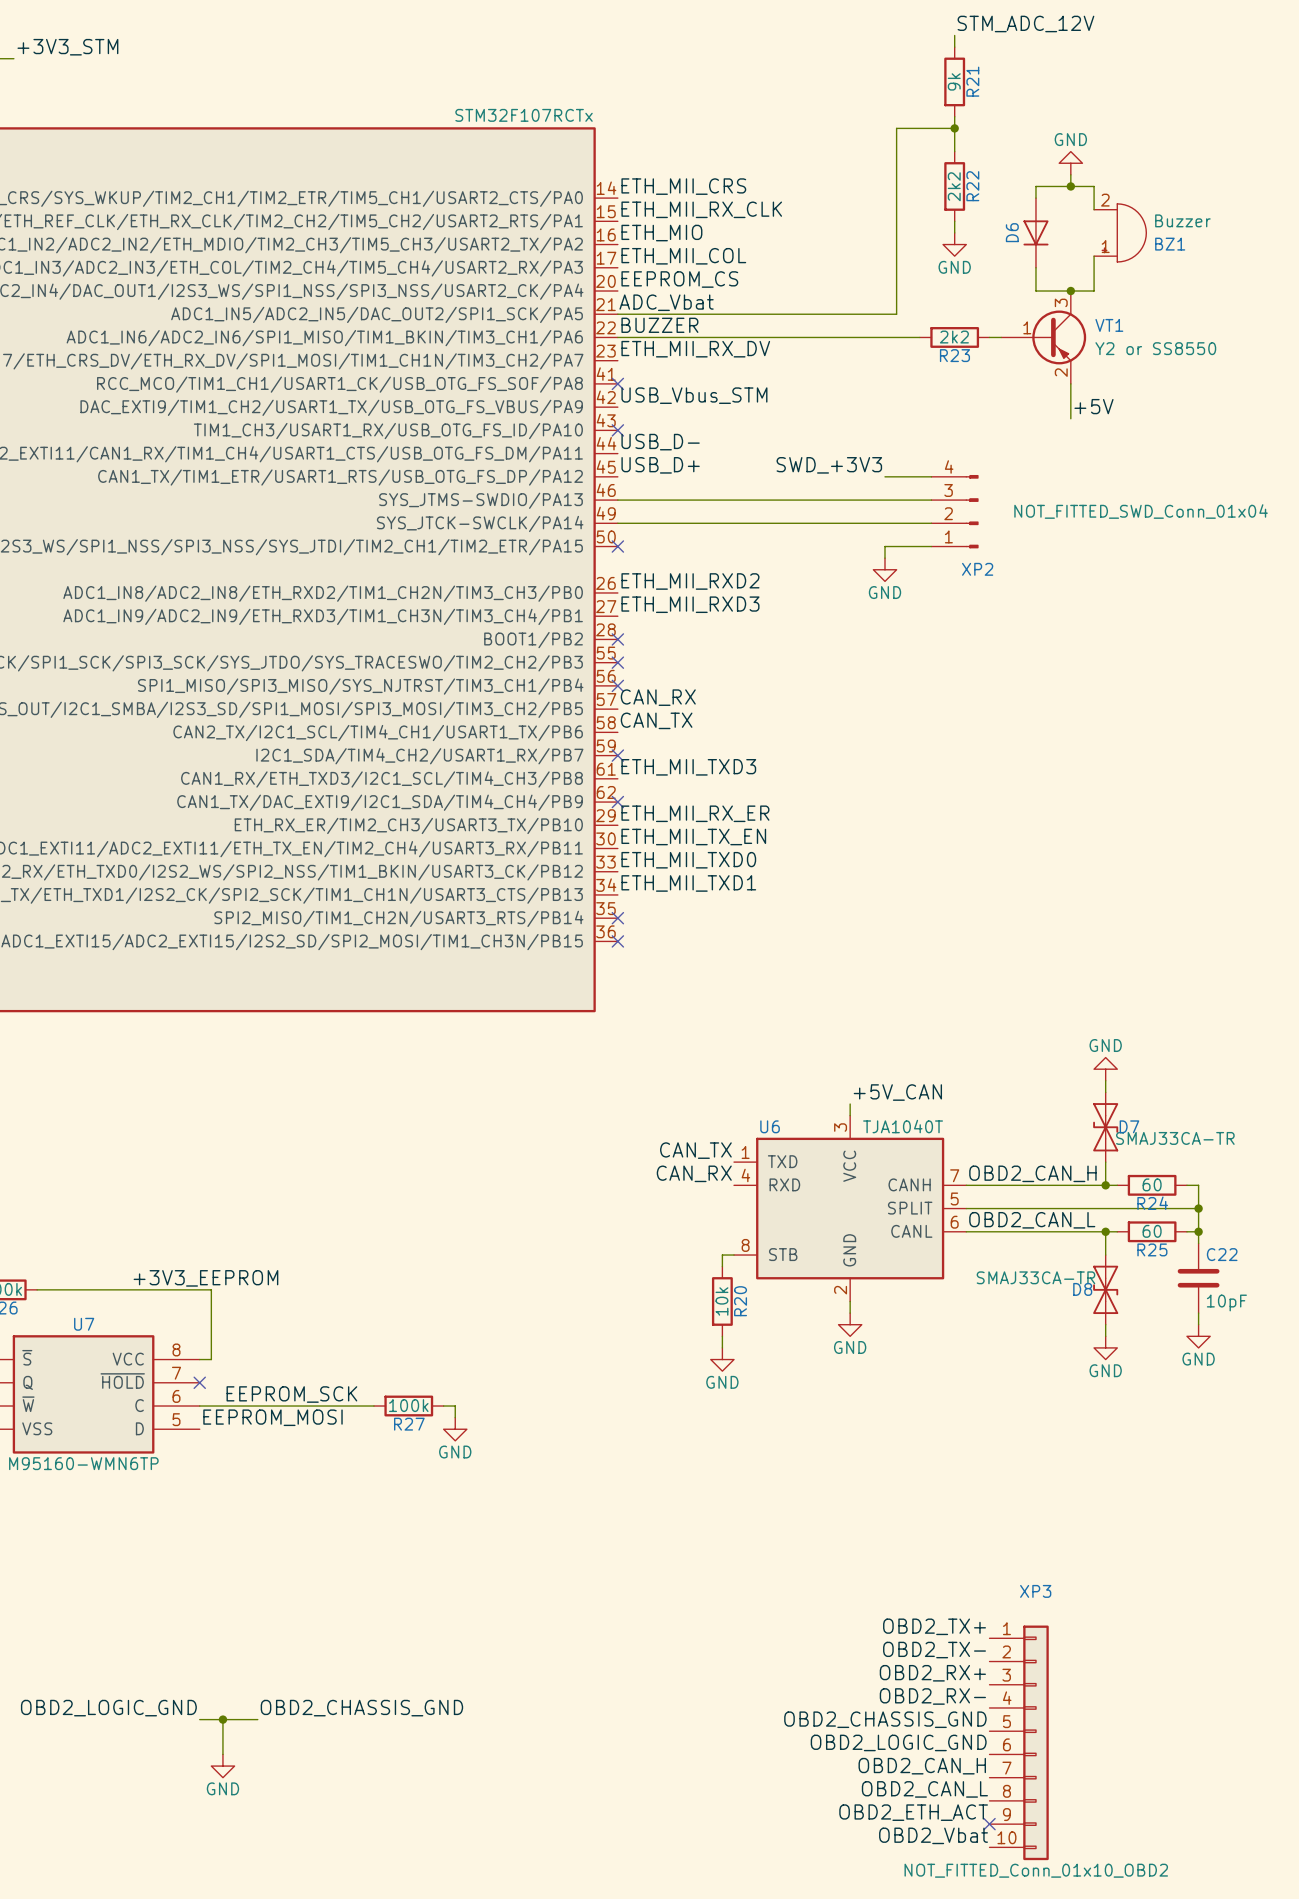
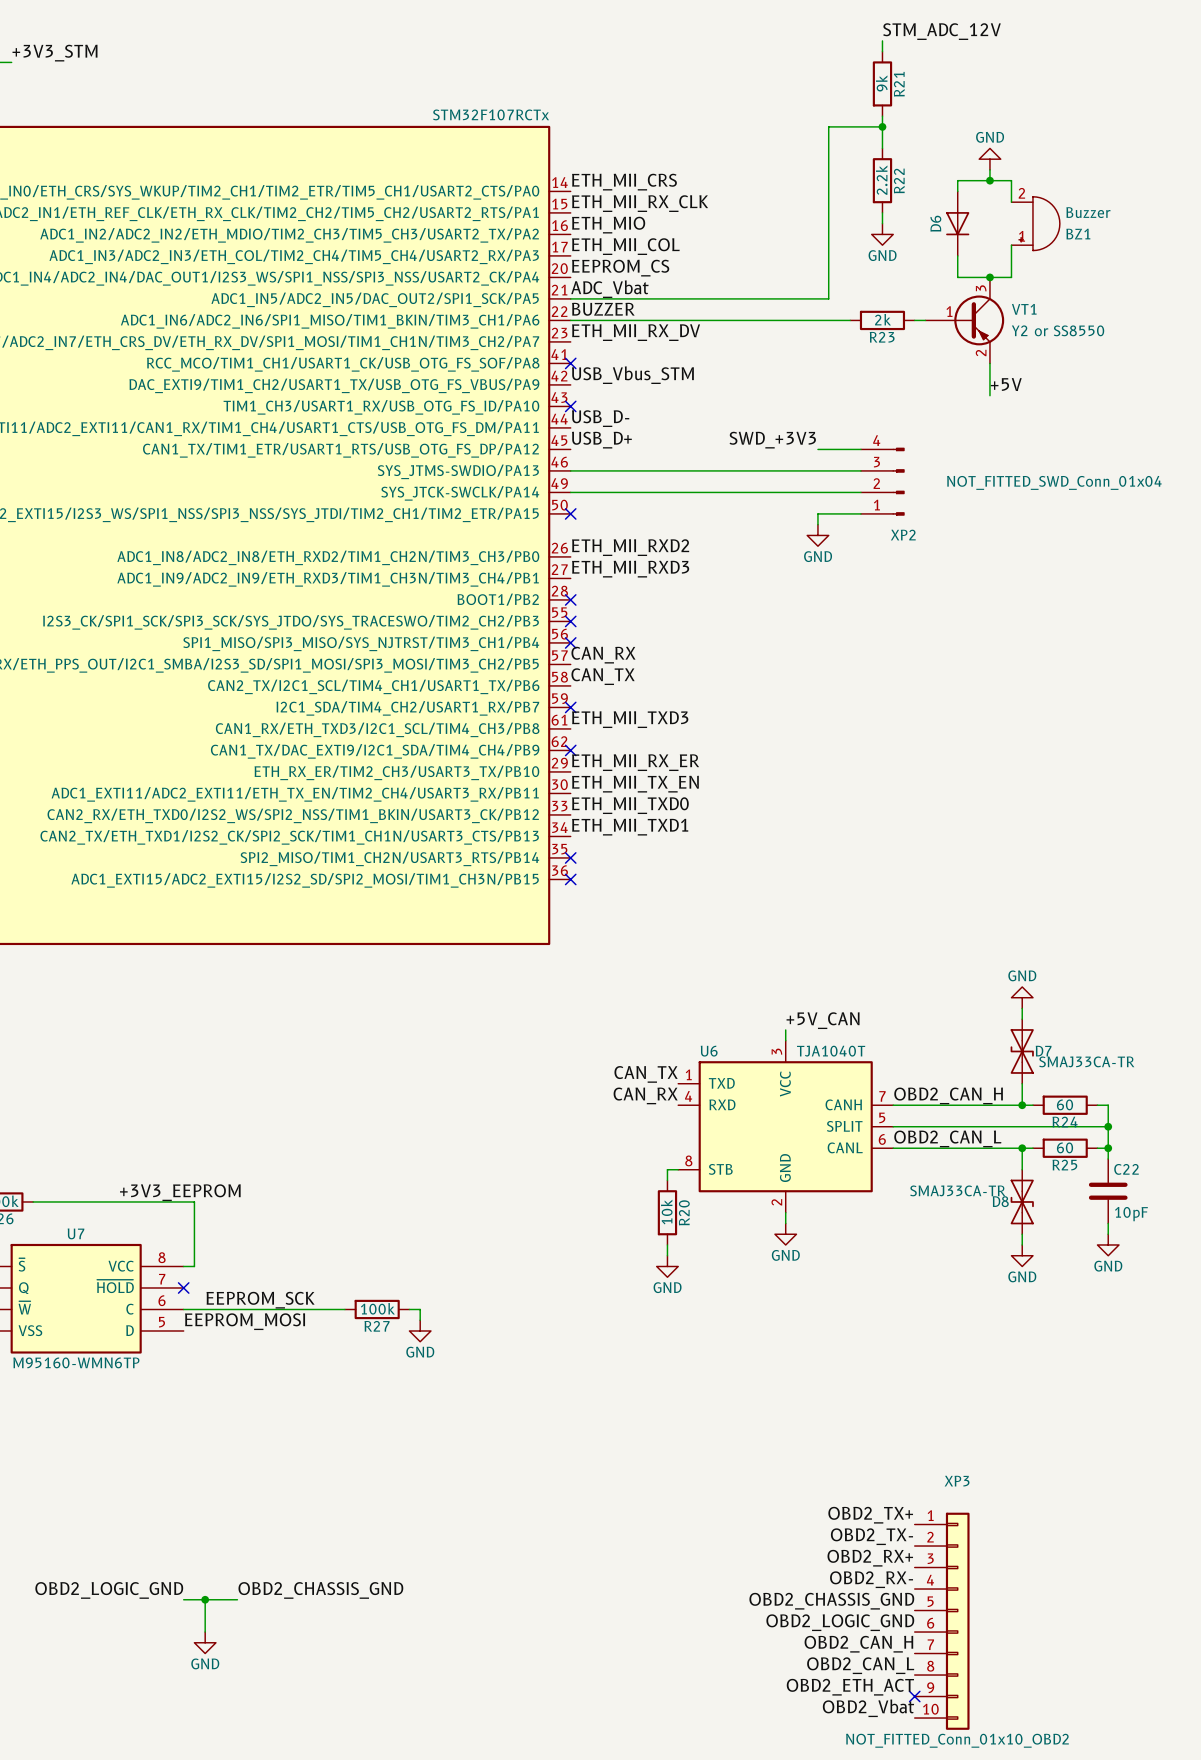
R22 value: 2k2 (954, 186) -> 2.2k (881, 180)
R23 value: 2k2 (954, 337) -> 2k (883, 319)

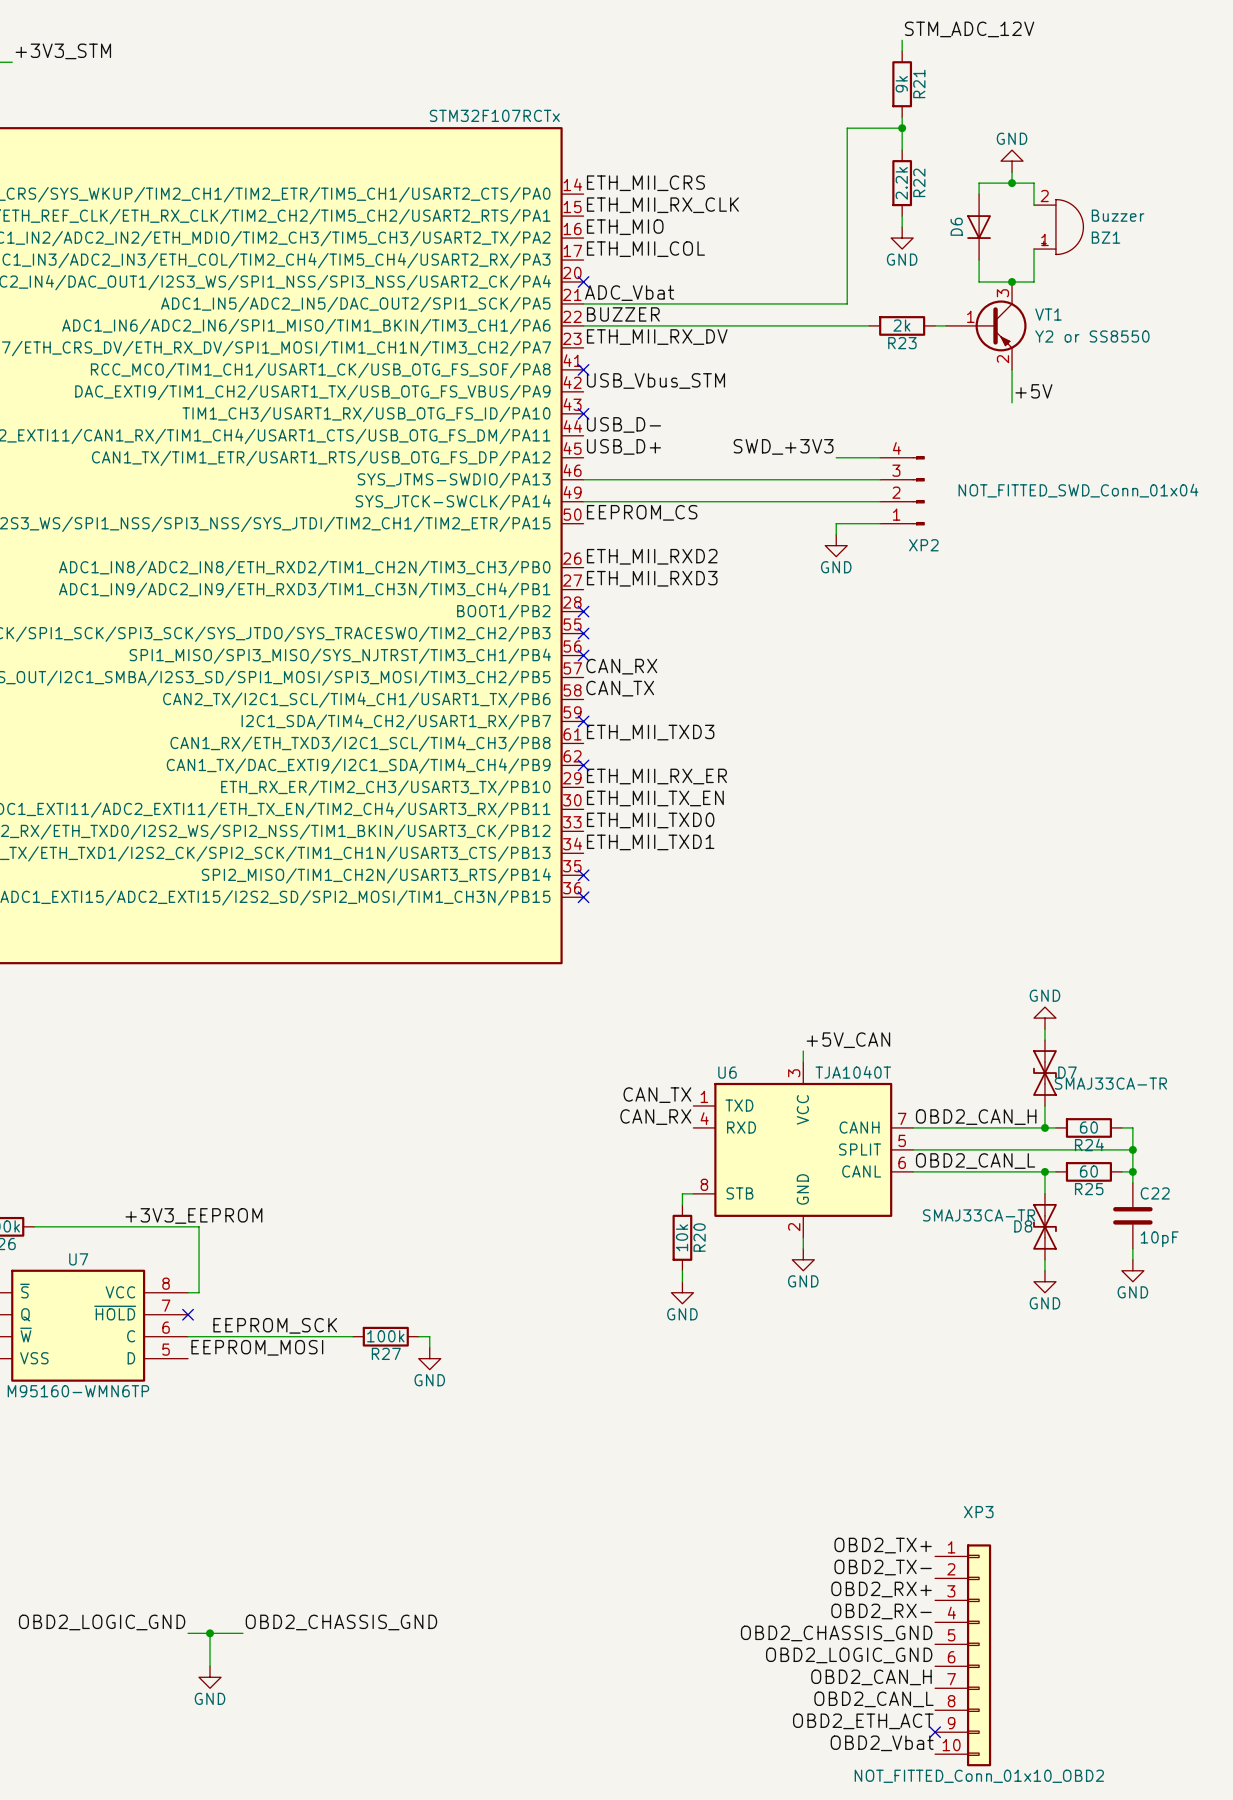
label: EEPROM_CS (620, 268) -> none
no-connect mark: none -> (583, 281)
label: none -> EEPROM_CS (642, 512)
no-connect mark: (570, 513) -> none

